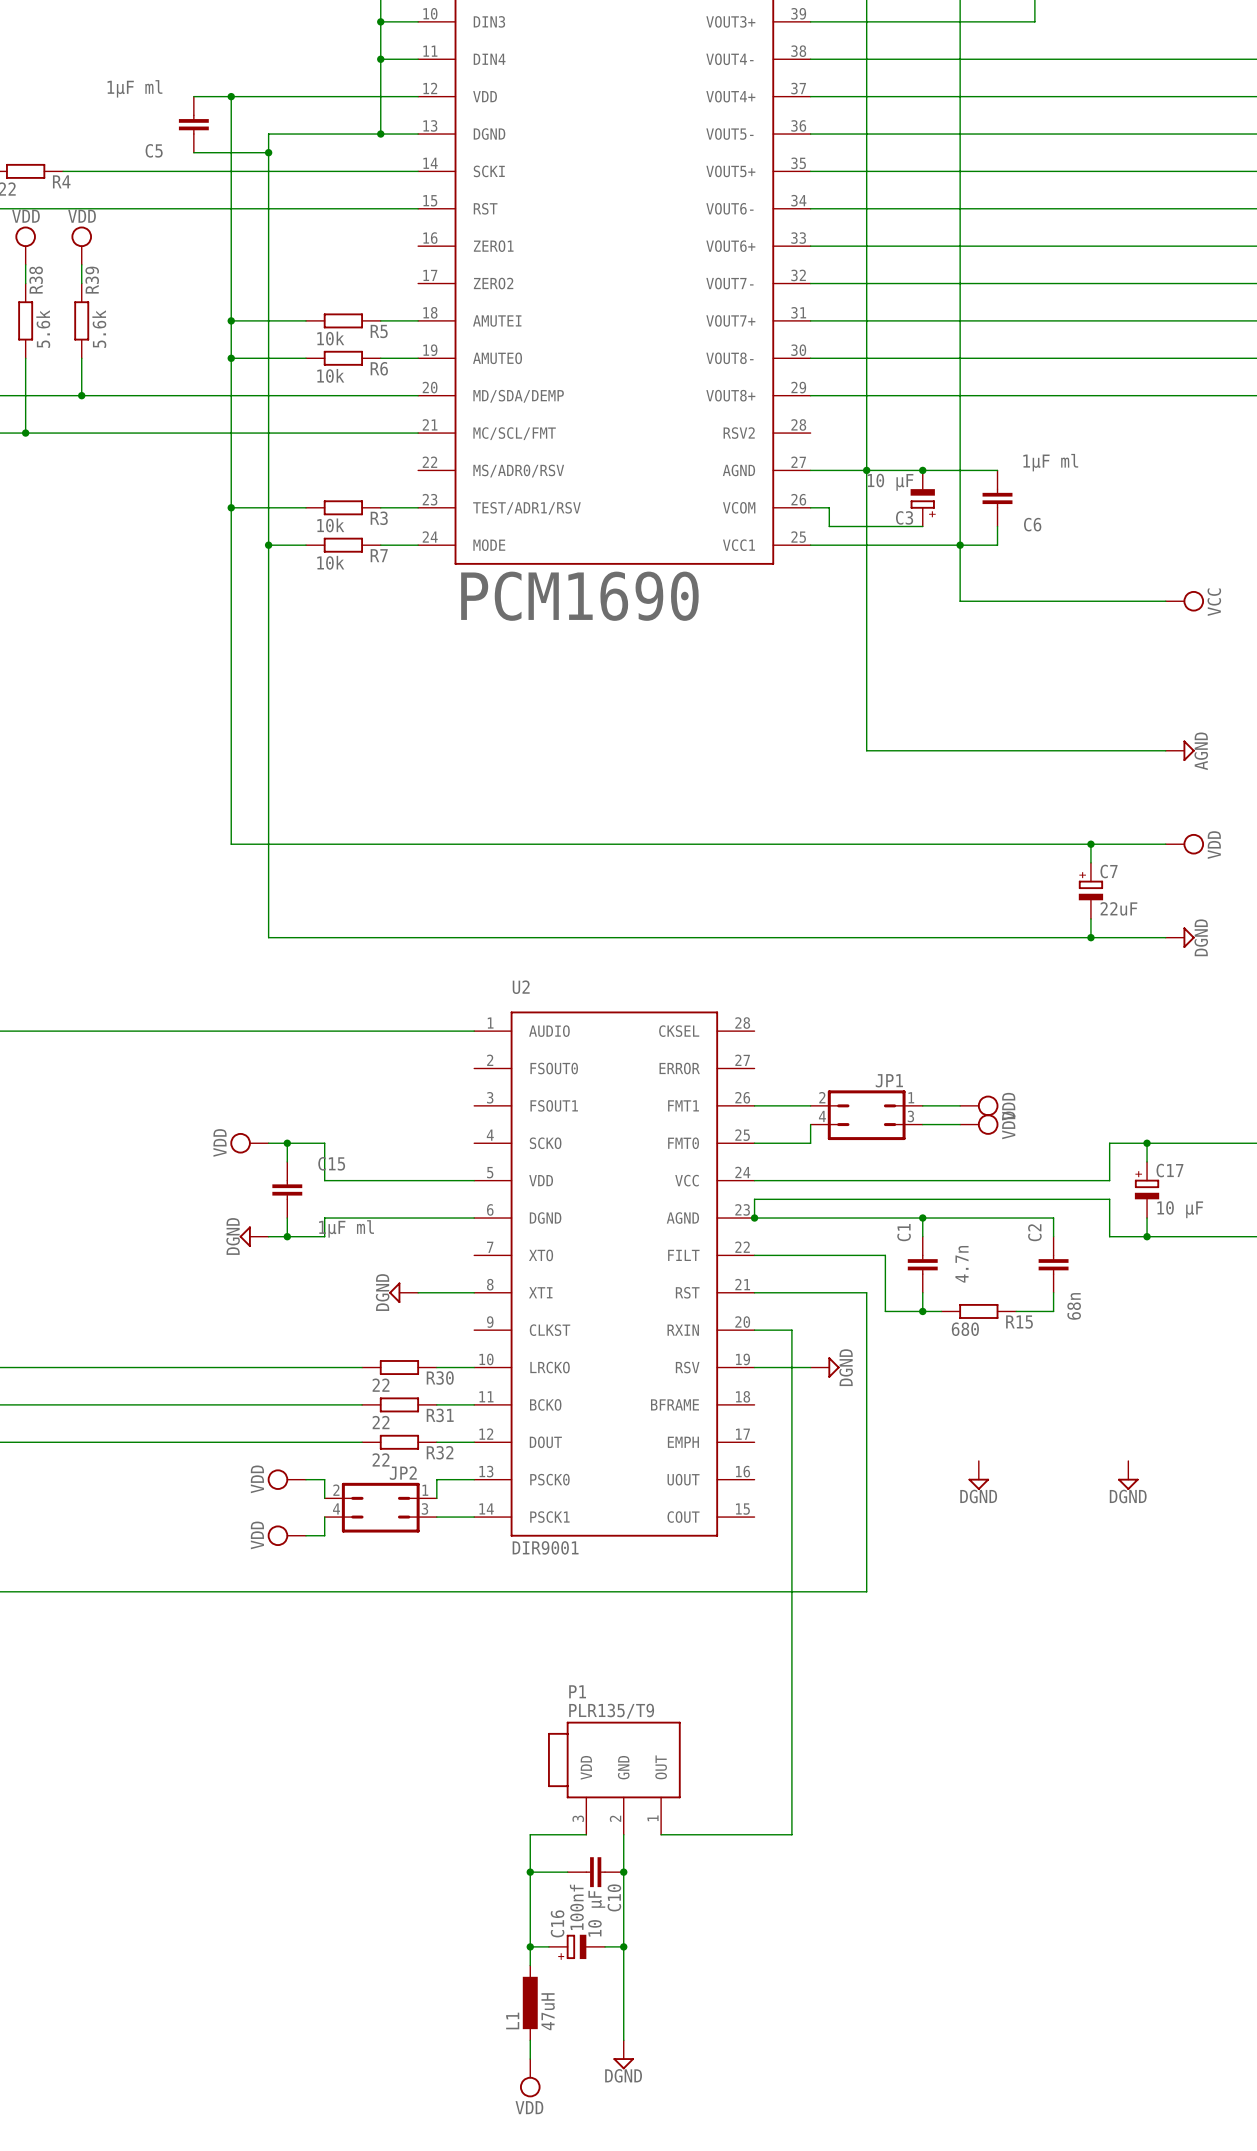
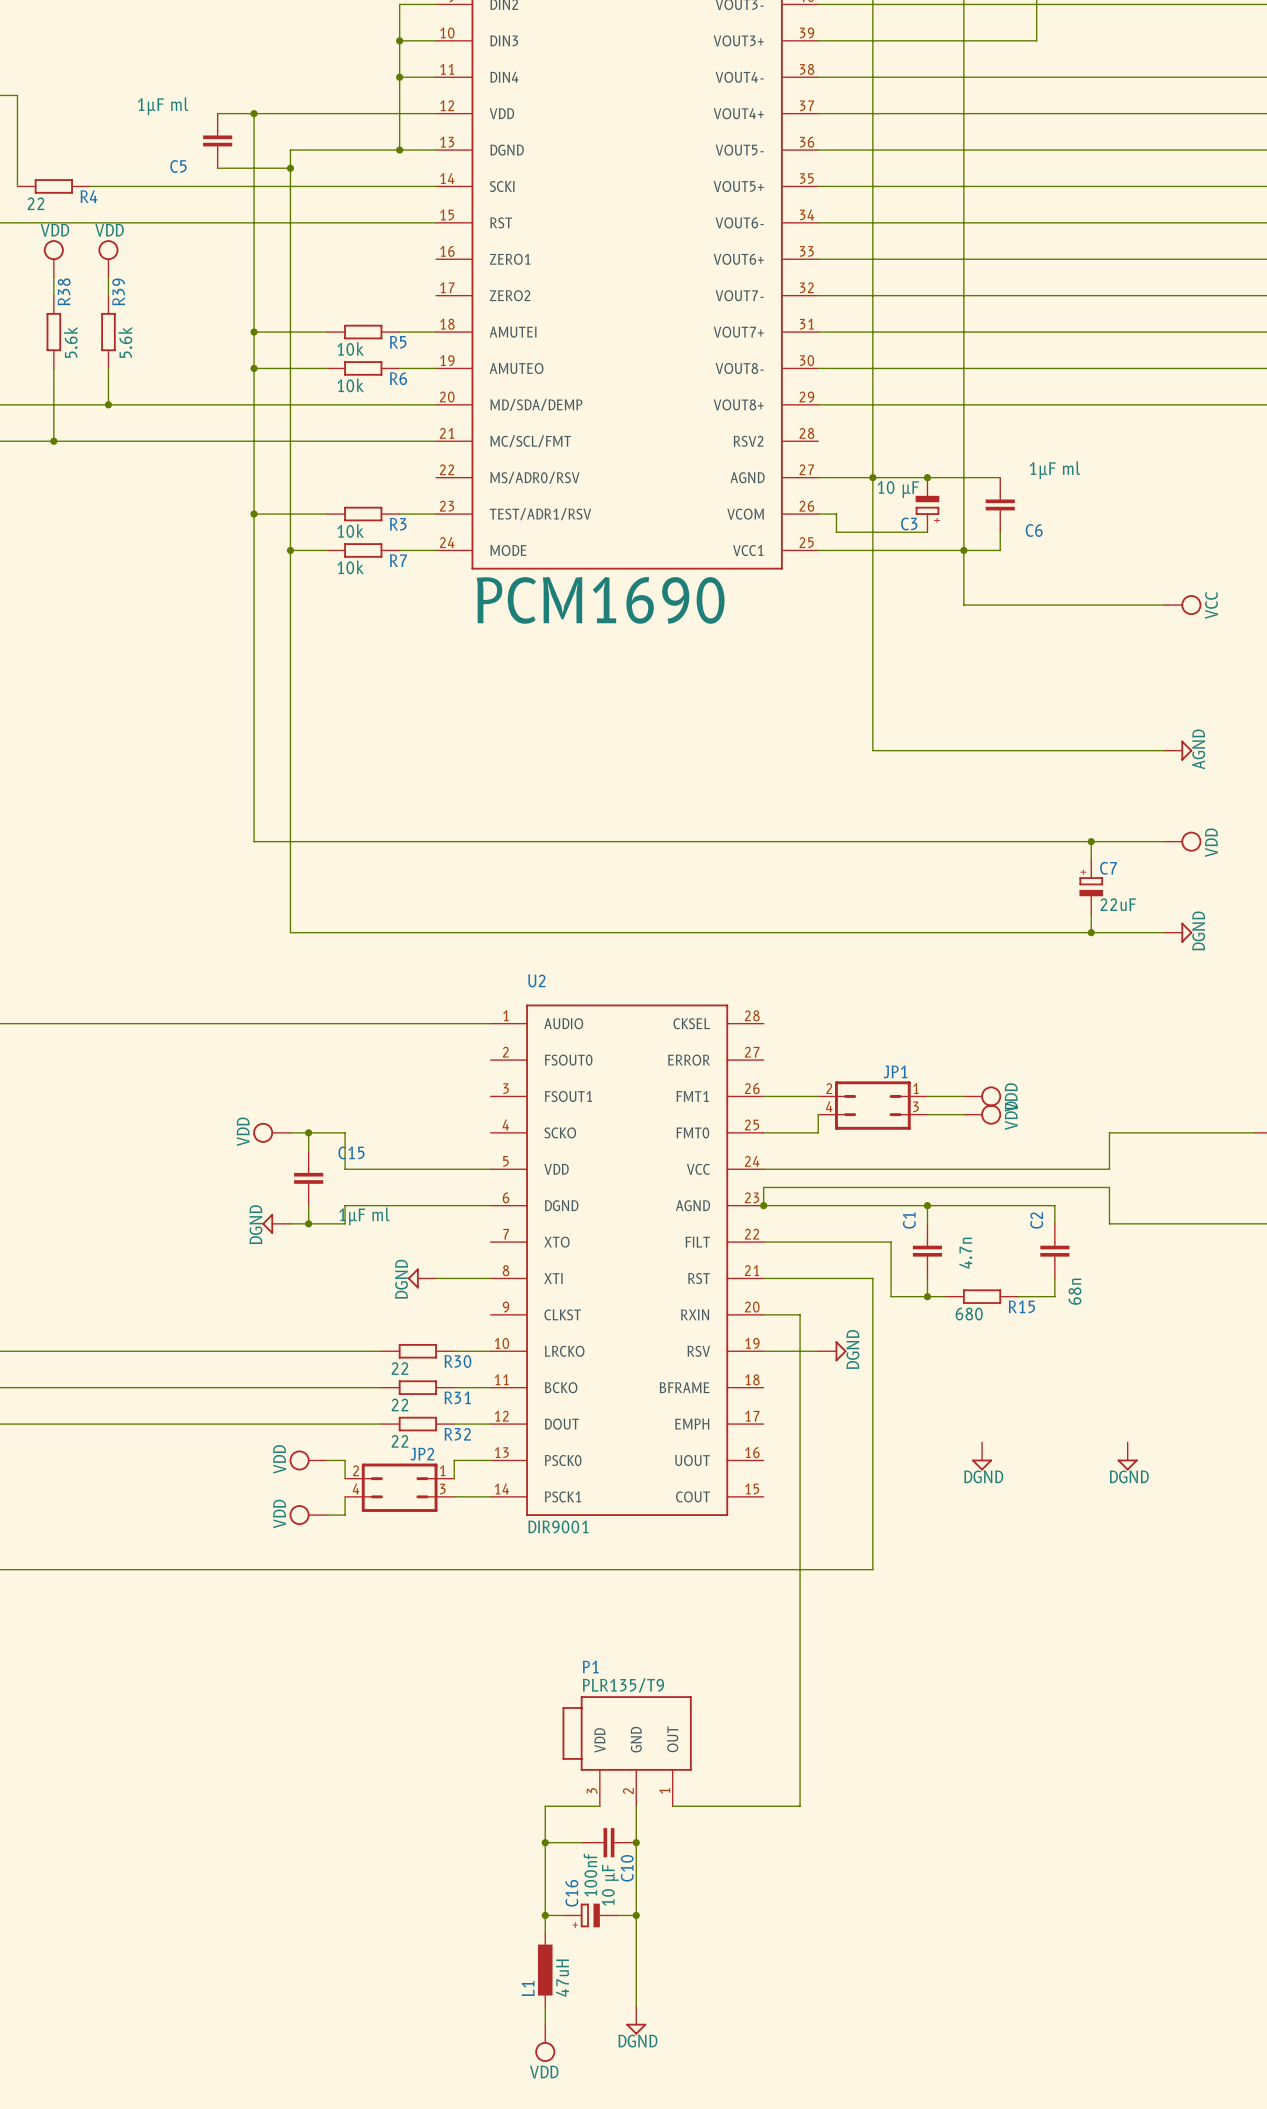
wire: (1147, 1143) (1147, 1161) -> none
junction: (1147, 1143) -> none
C17: 10 µF (1147, 1189) -> none
wire: (1147, 1218) (1147, 1236) -> none
junction: (1147, 1236) -> none

